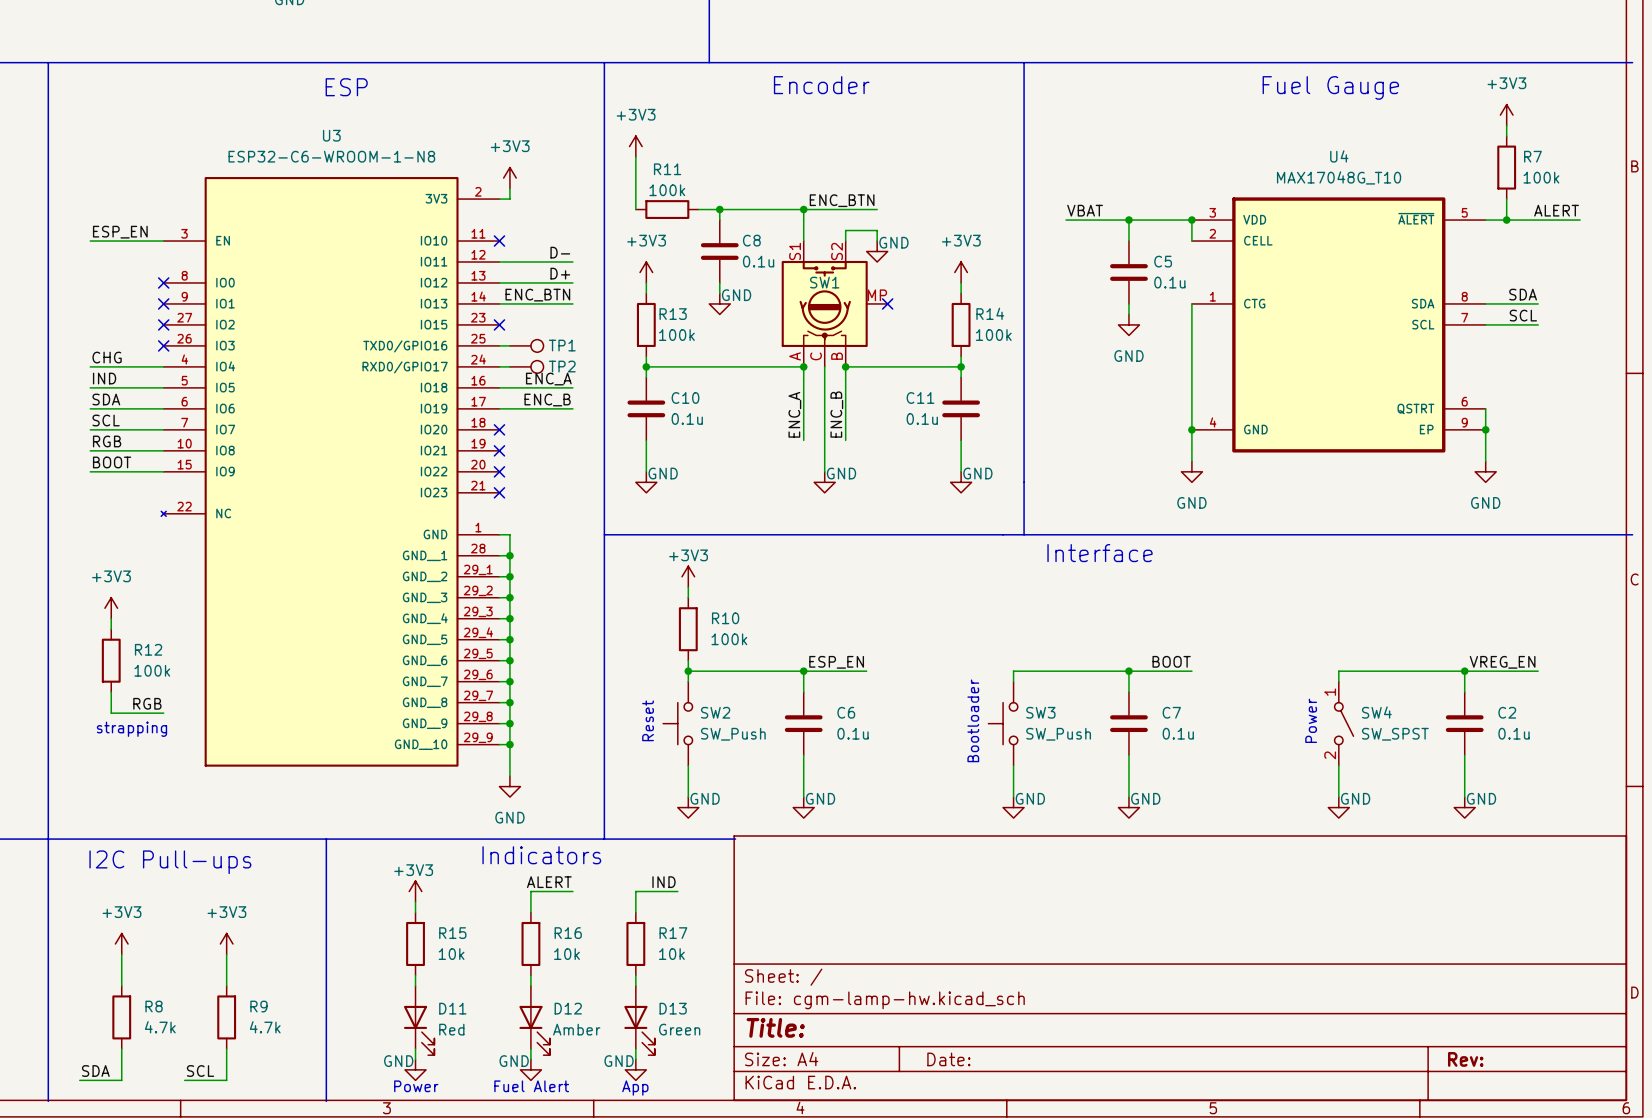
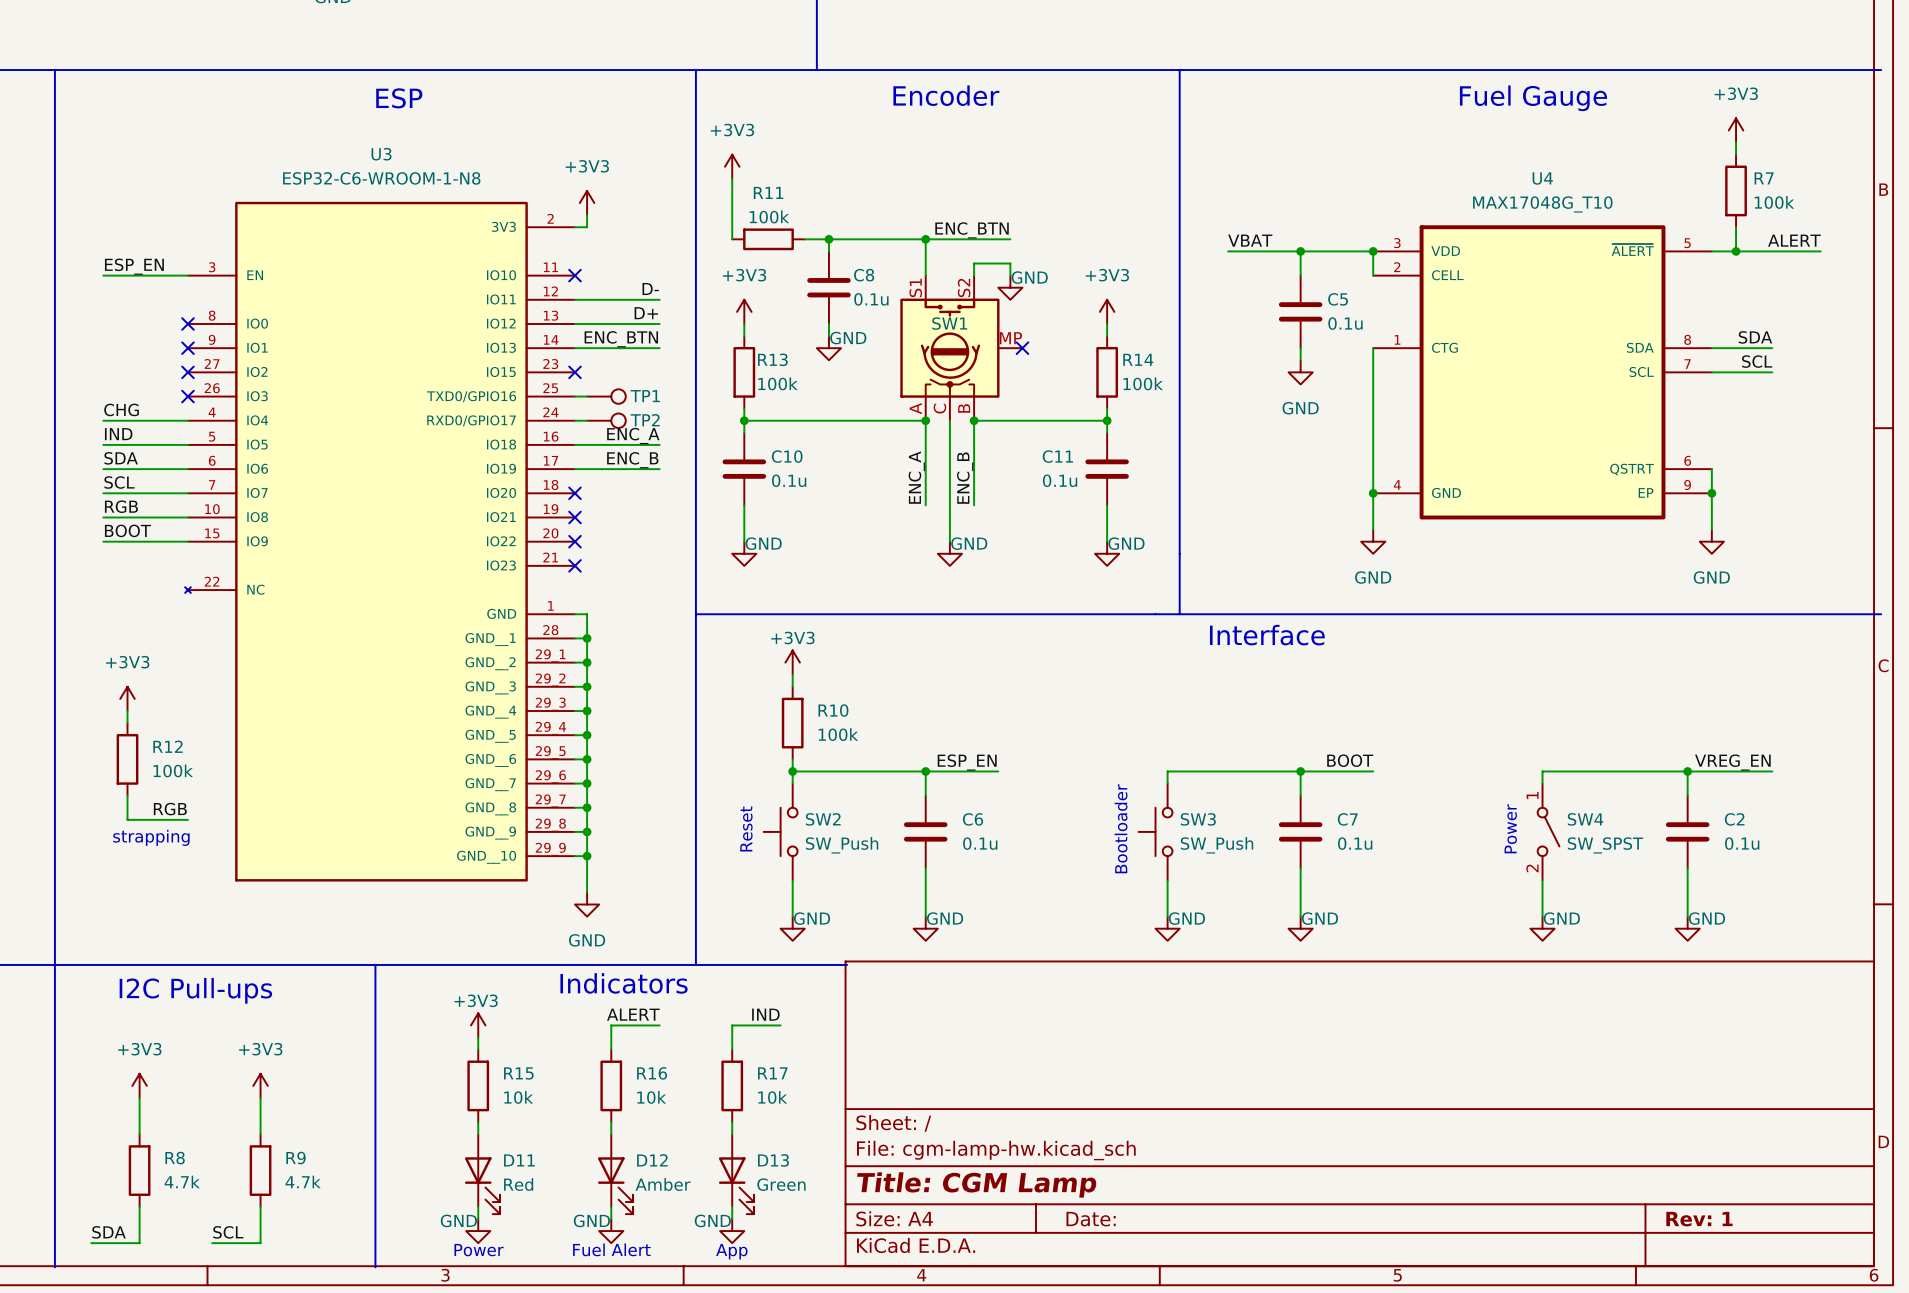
title block: Title: (775, 1027) -> Title: CGM Lamp (976, 1184)
title block: Rev: (1465, 1059) -> Rev: 1 (1699, 1219)

